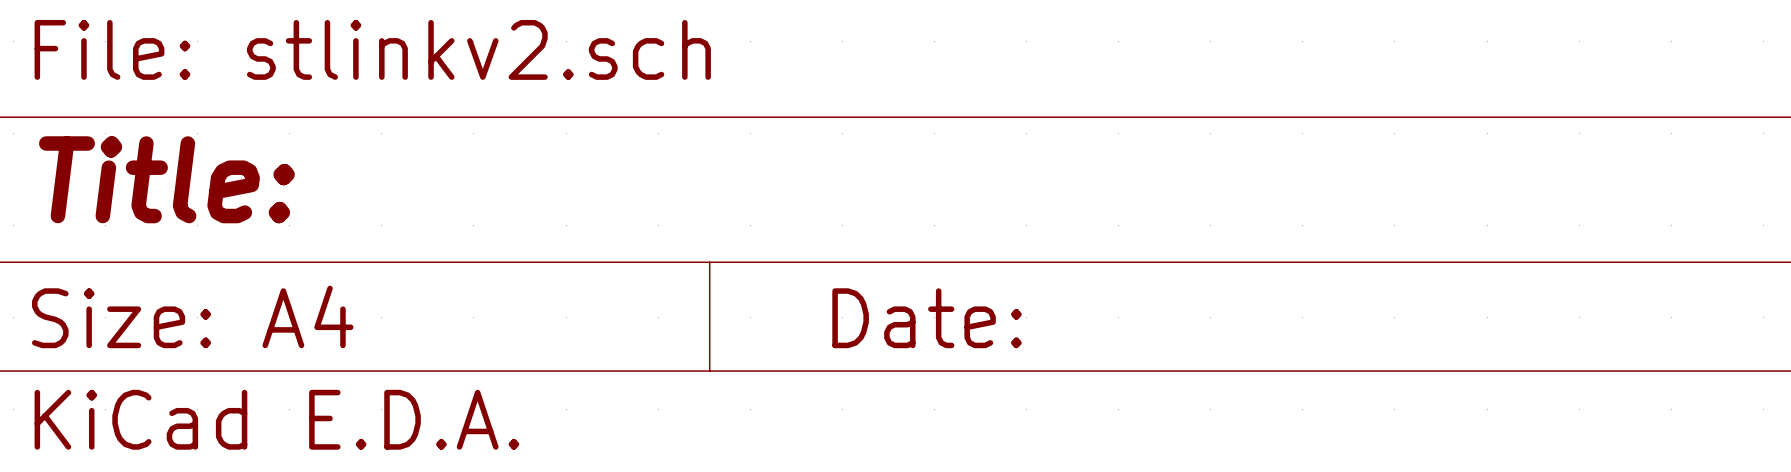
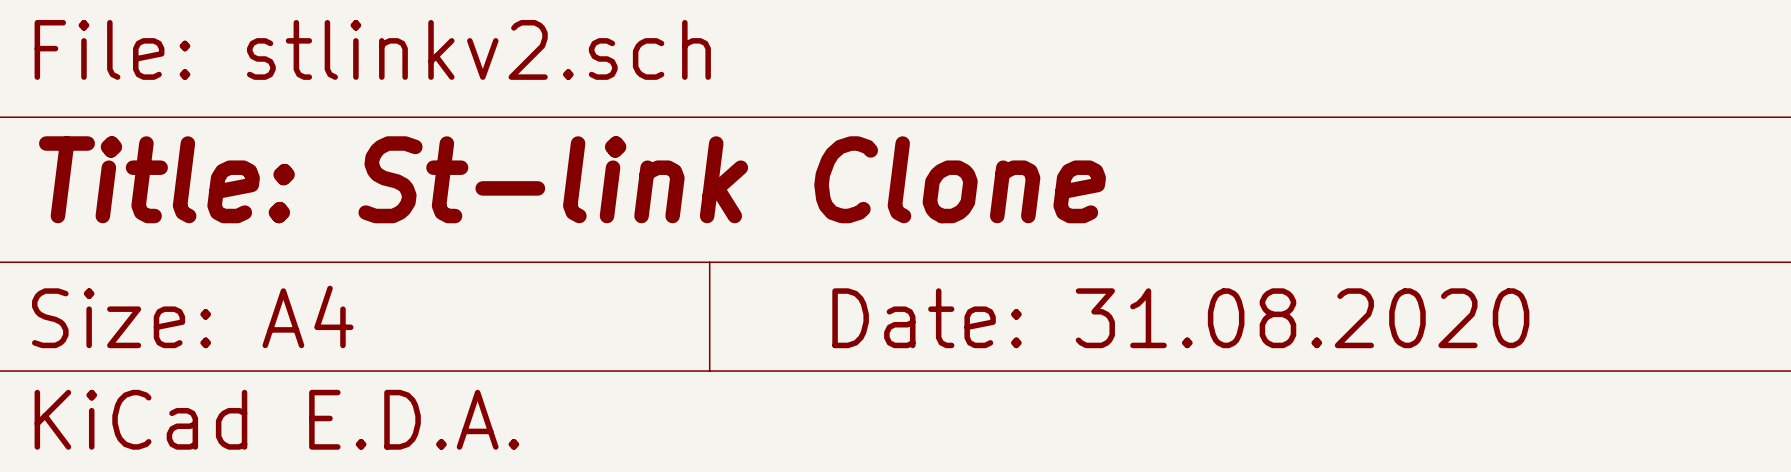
title block: Title: (166, 179) -> Title: St-link Clone (572, 179)
title block: Date: (927, 318) -> Date: 31.08.2020 (1180, 318)

